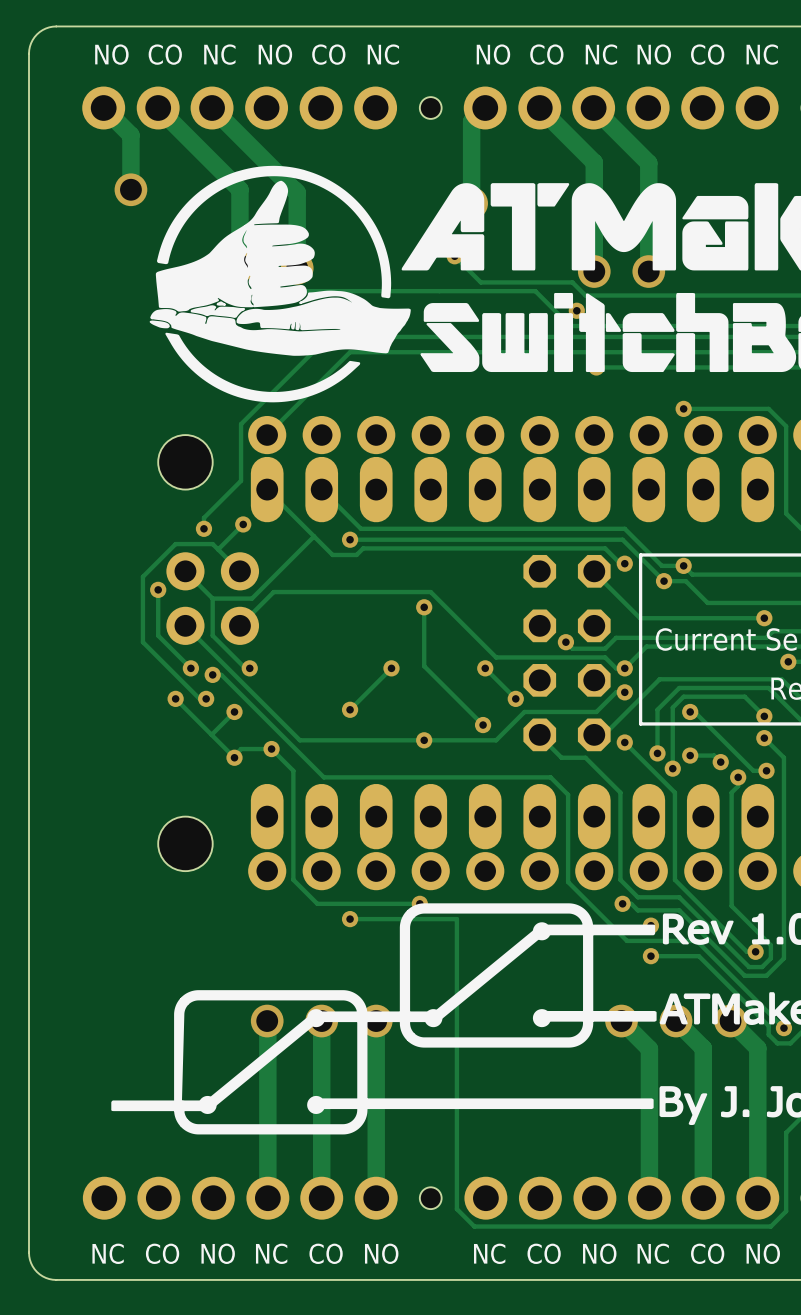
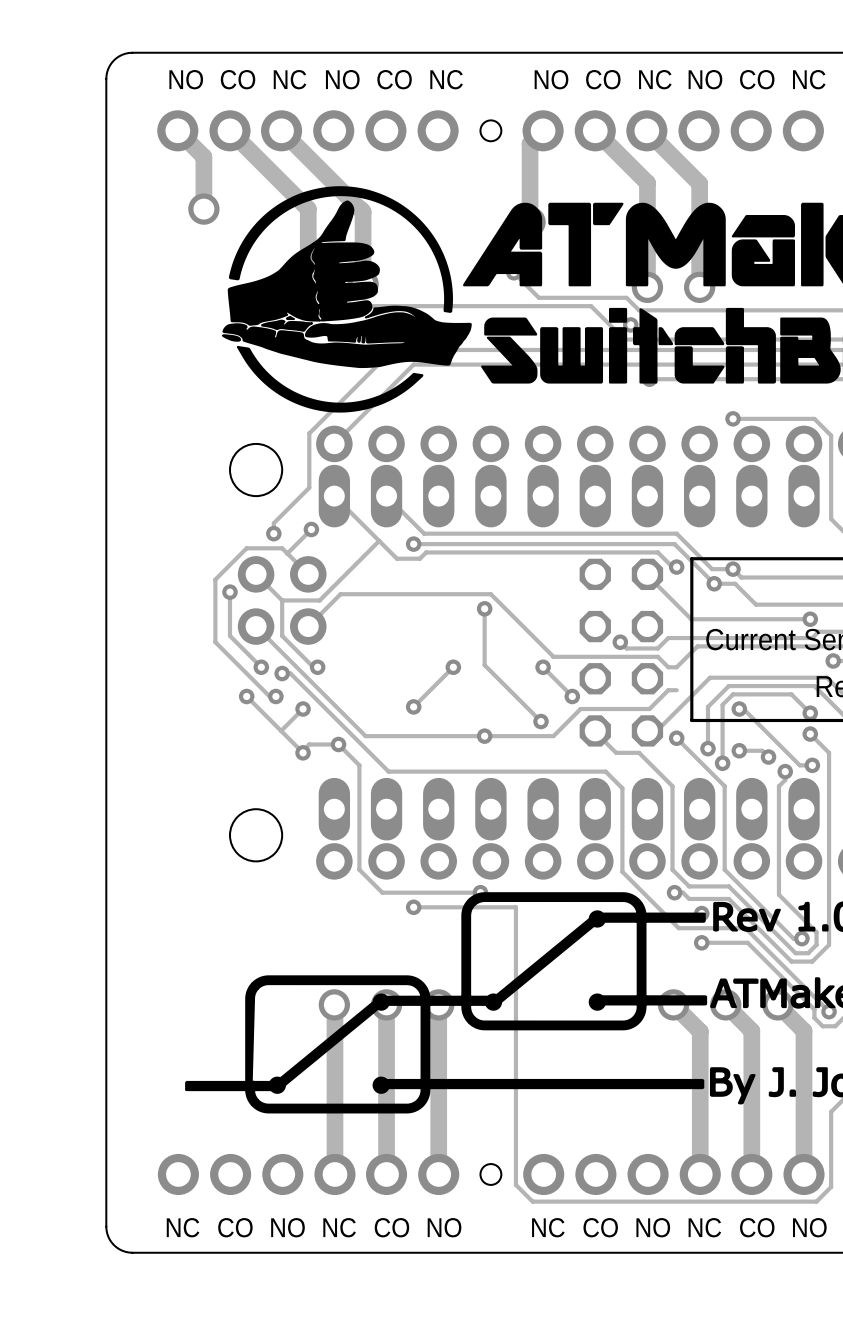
via: (624, 668) -> none
via: (624, 692) -> none

